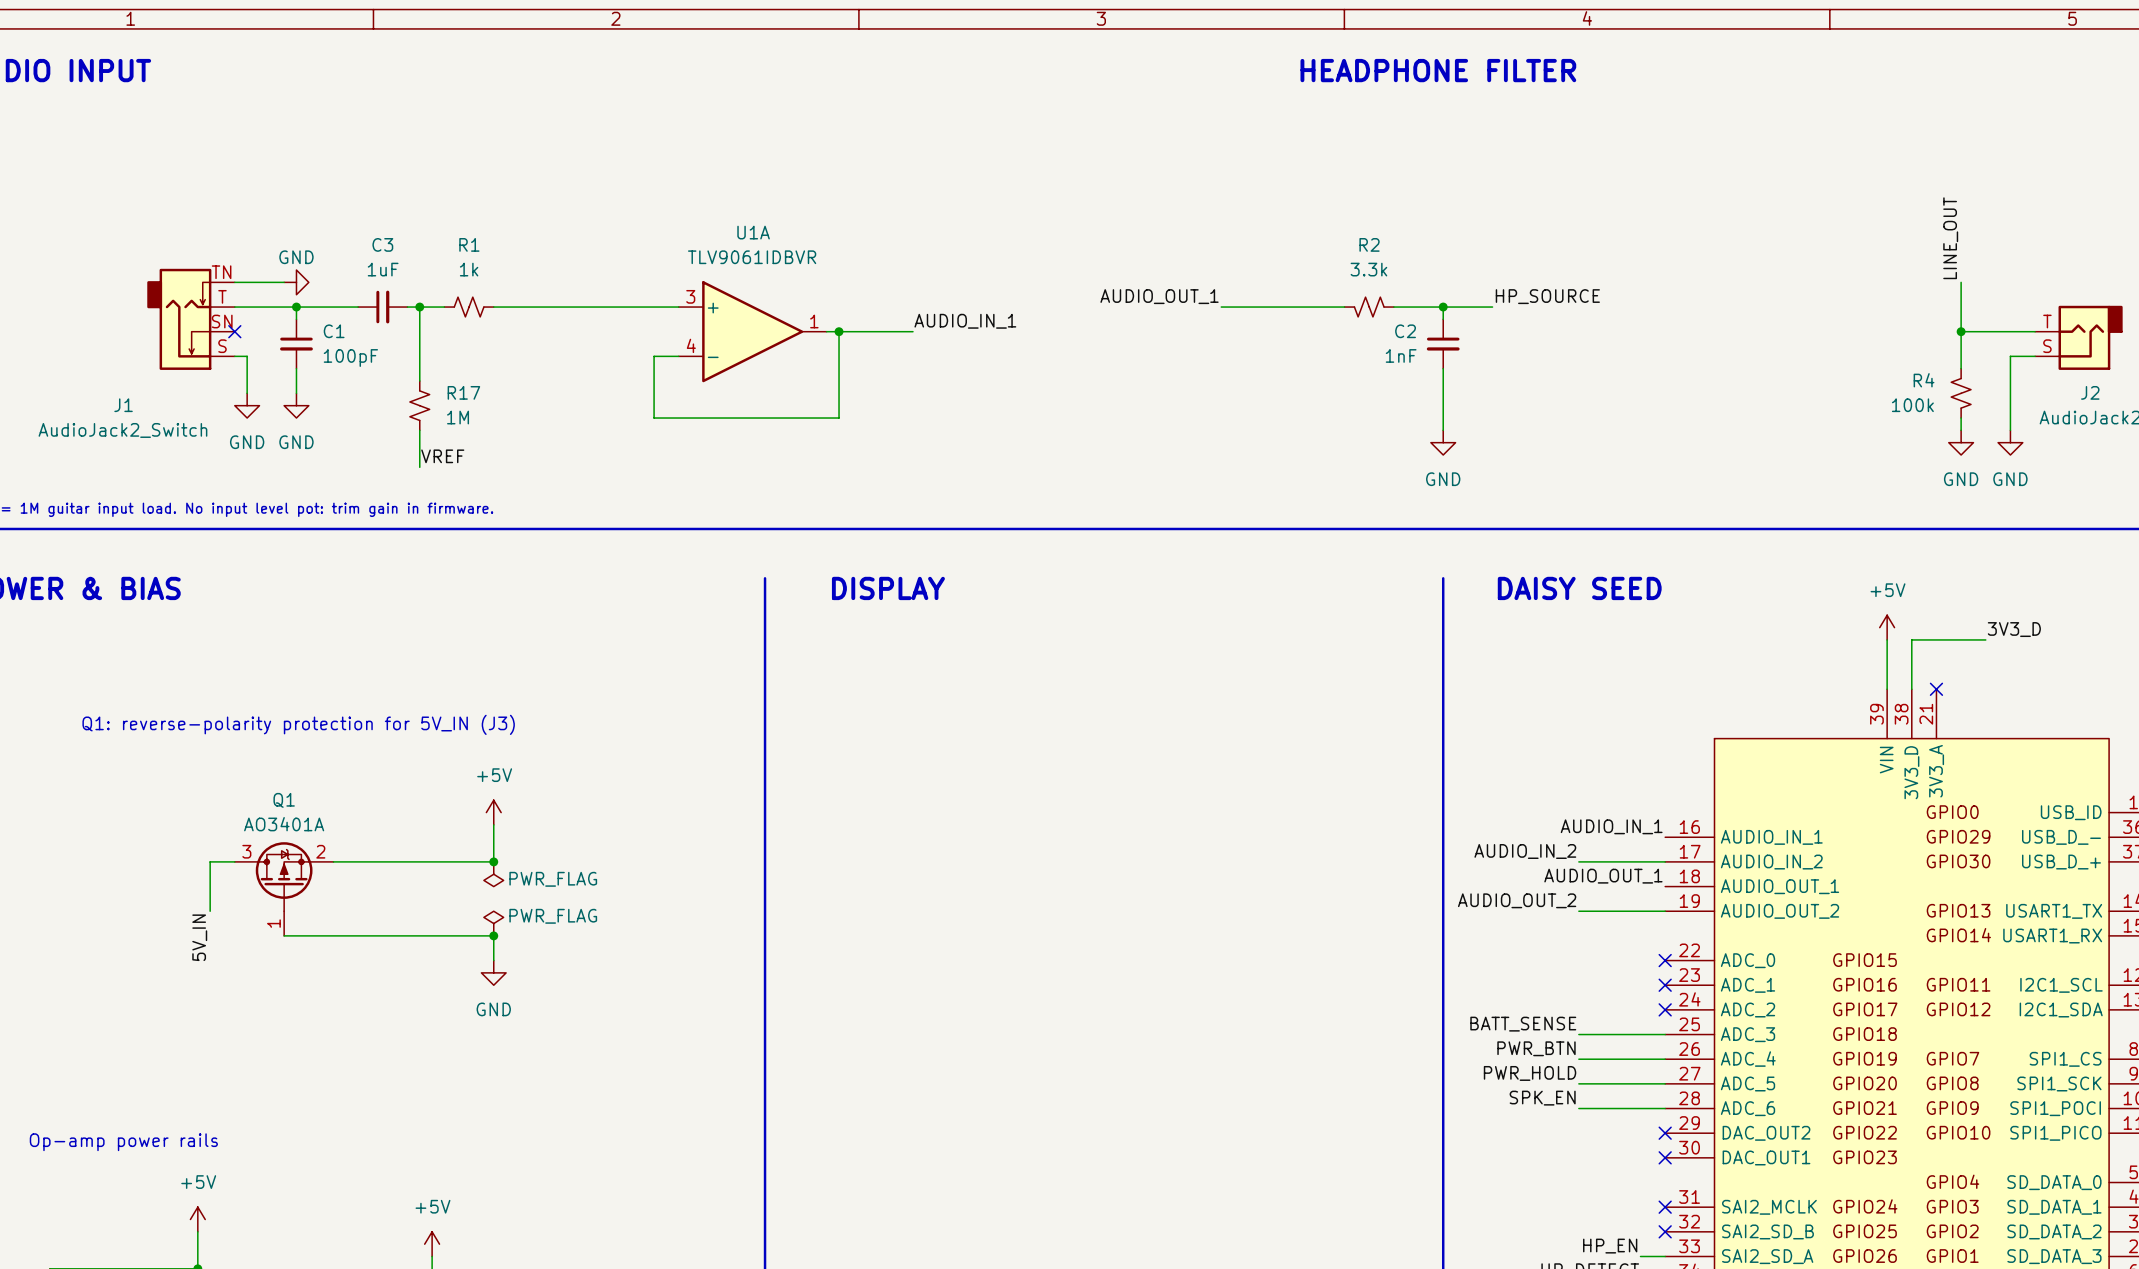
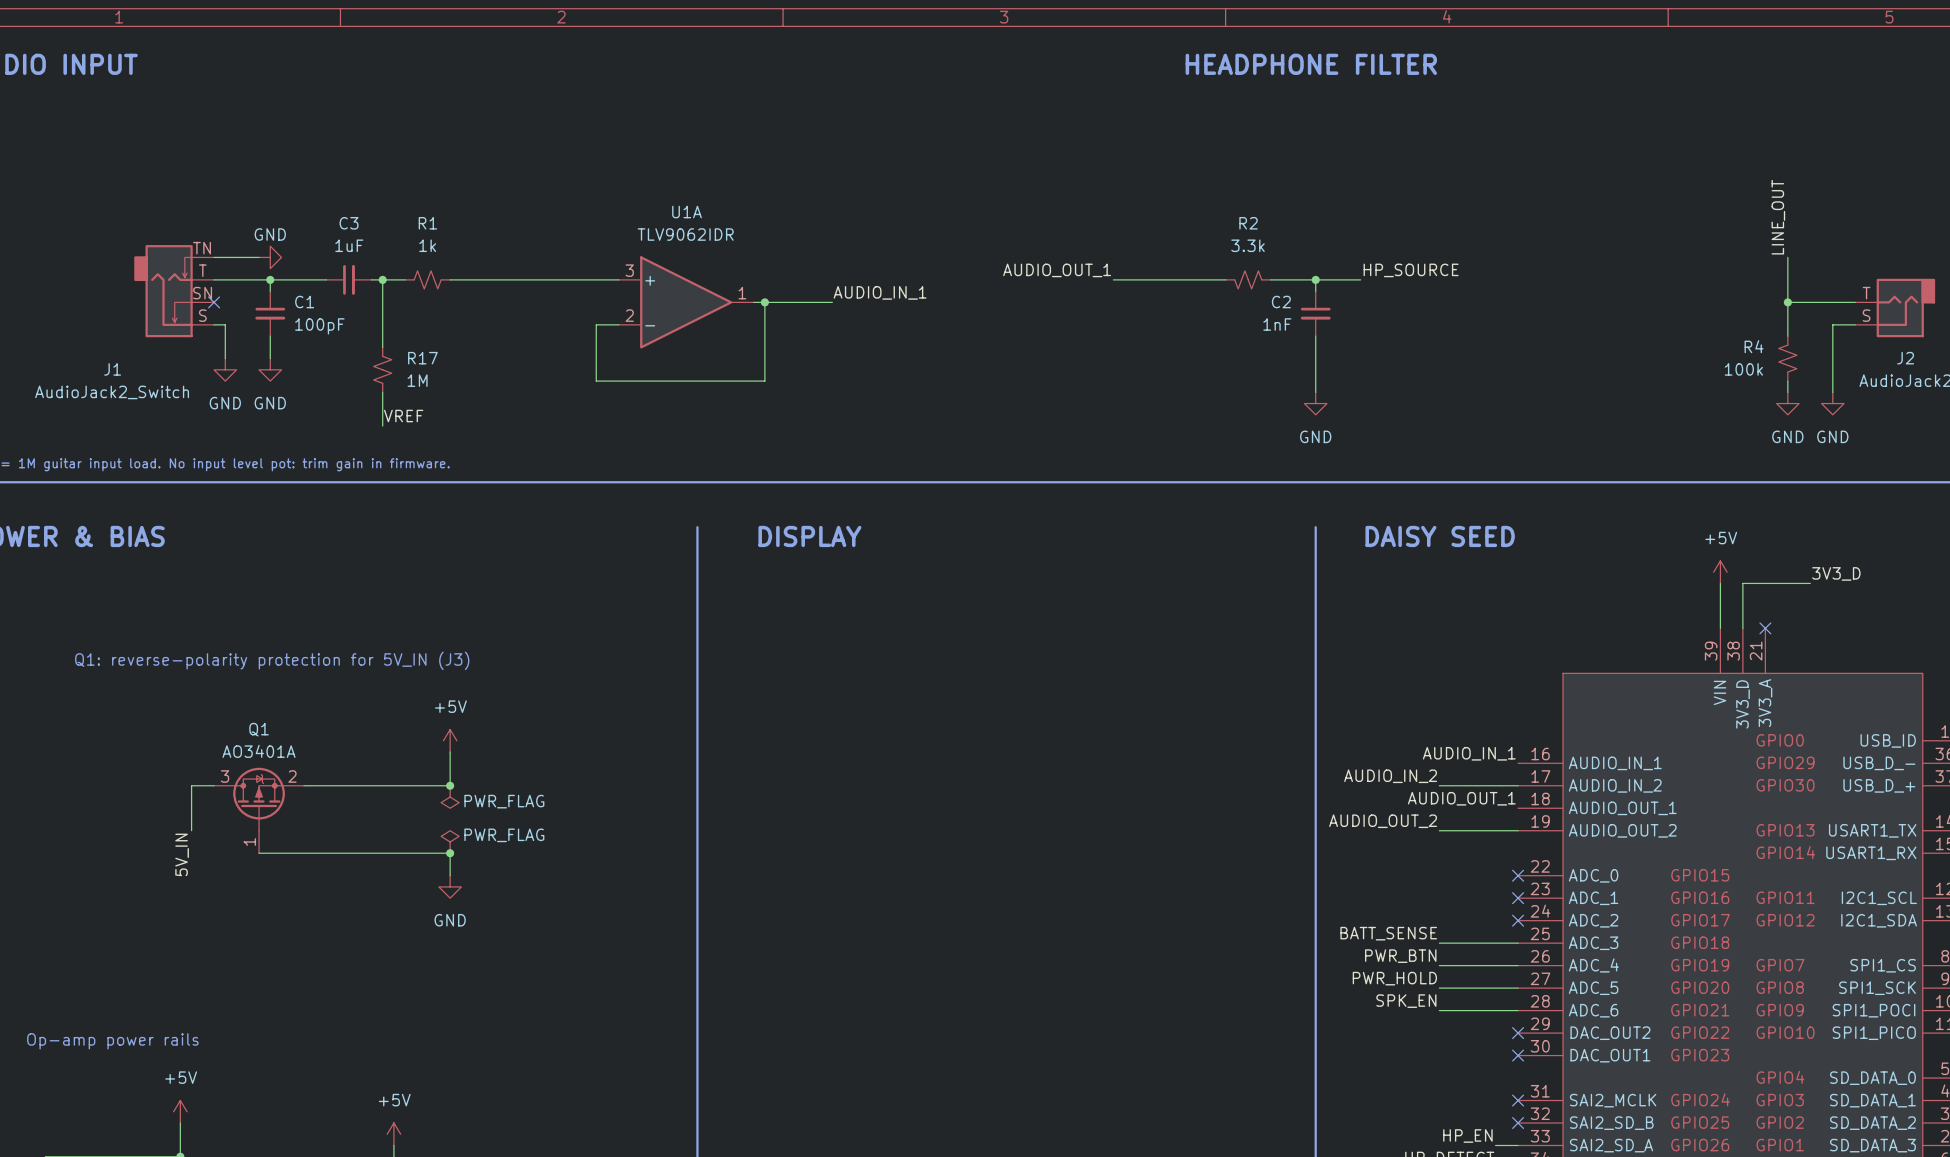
U1A value: TLV9061IDBVR (752, 257) -> TLV9062IDR (685, 234)
U1A pin number: 4 (691, 345) -> 2 (629, 315)

